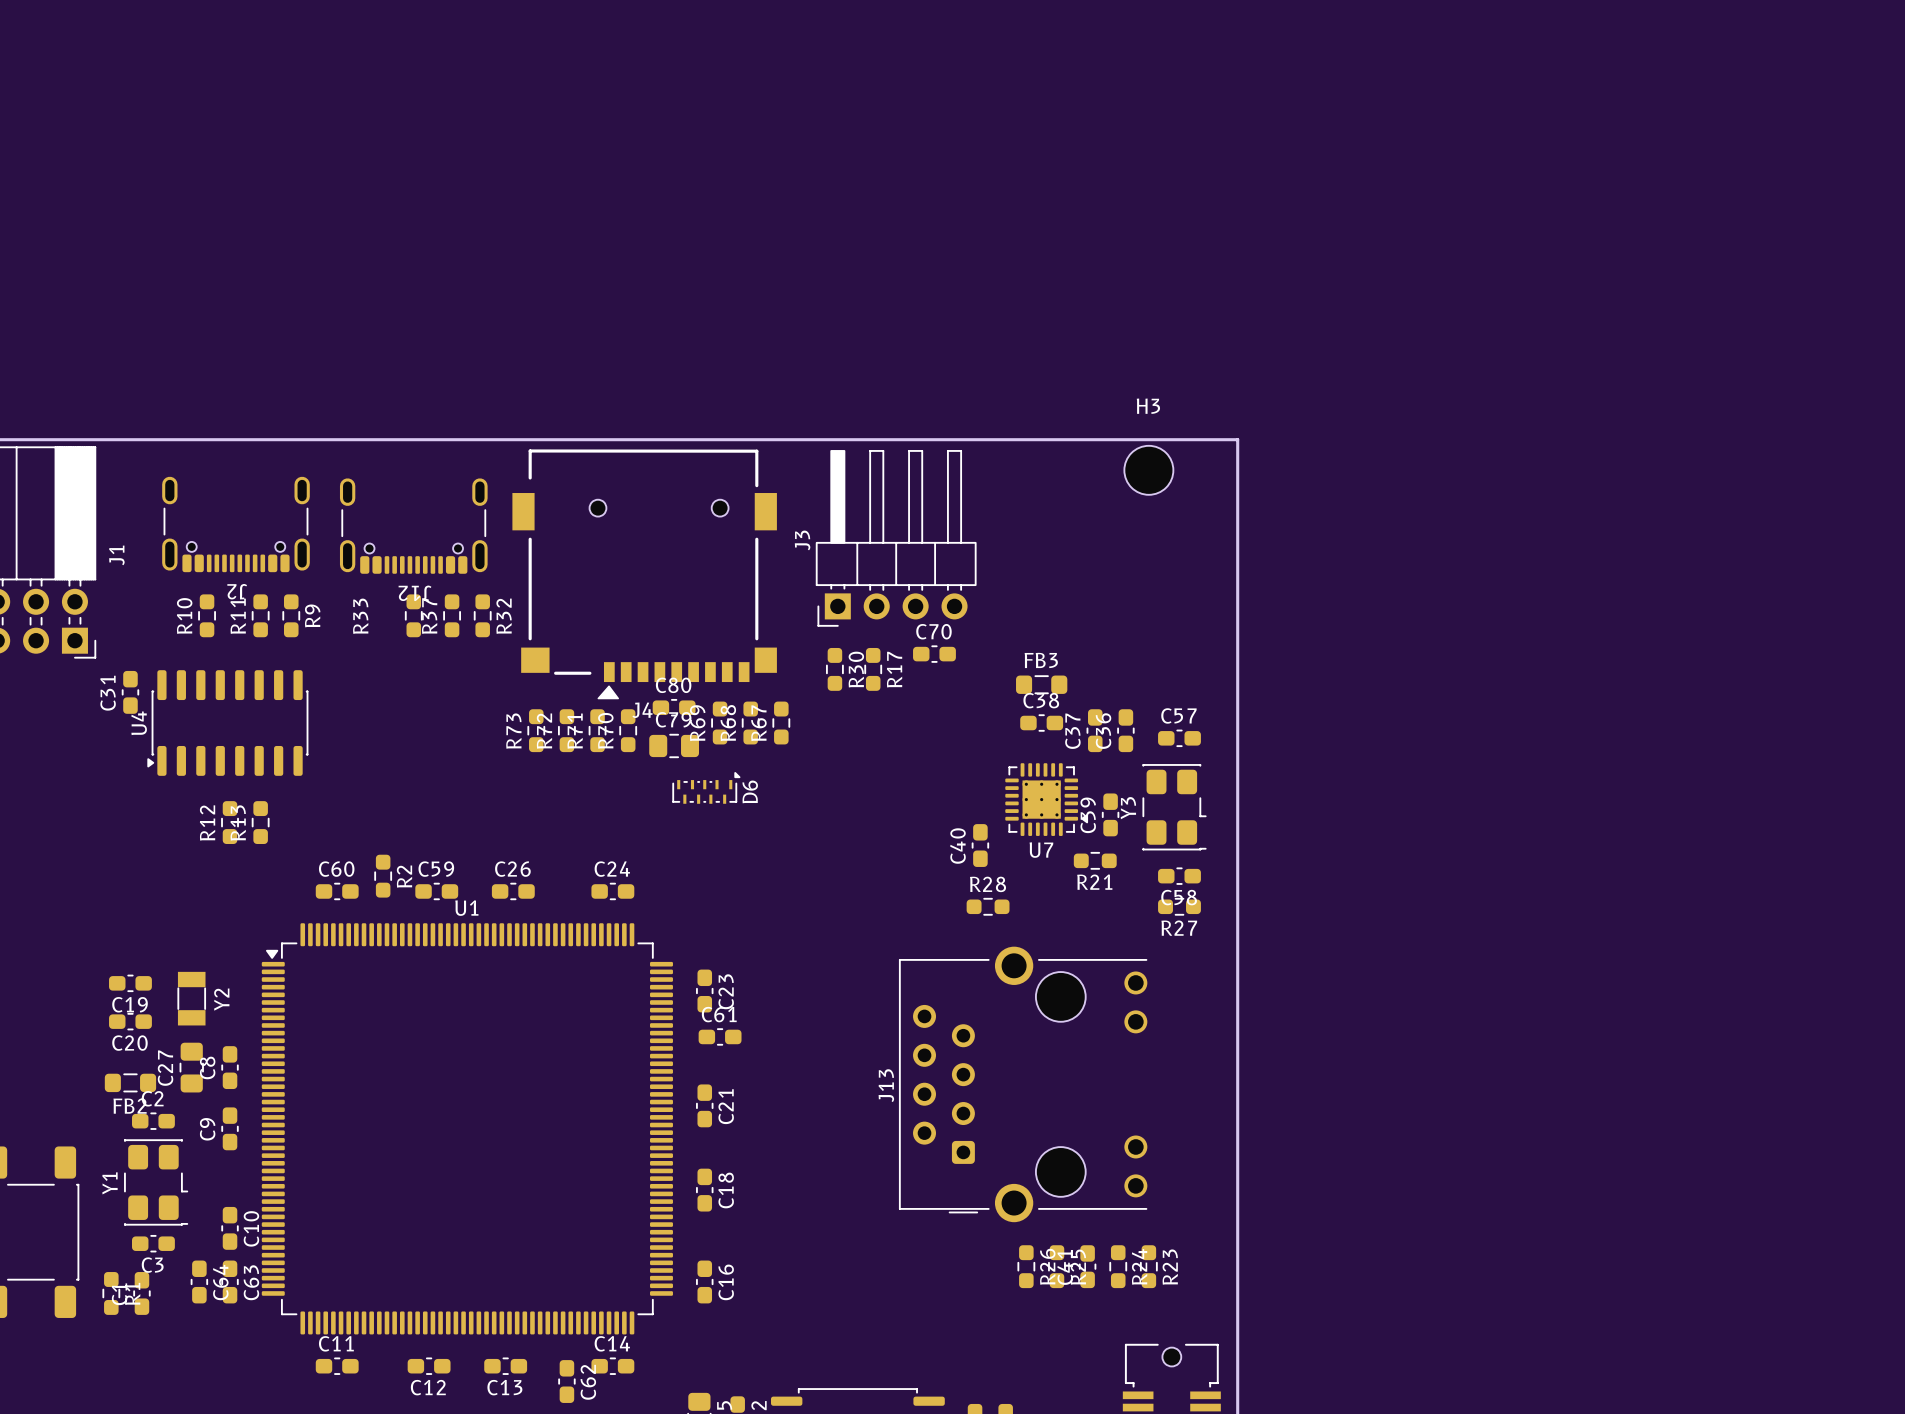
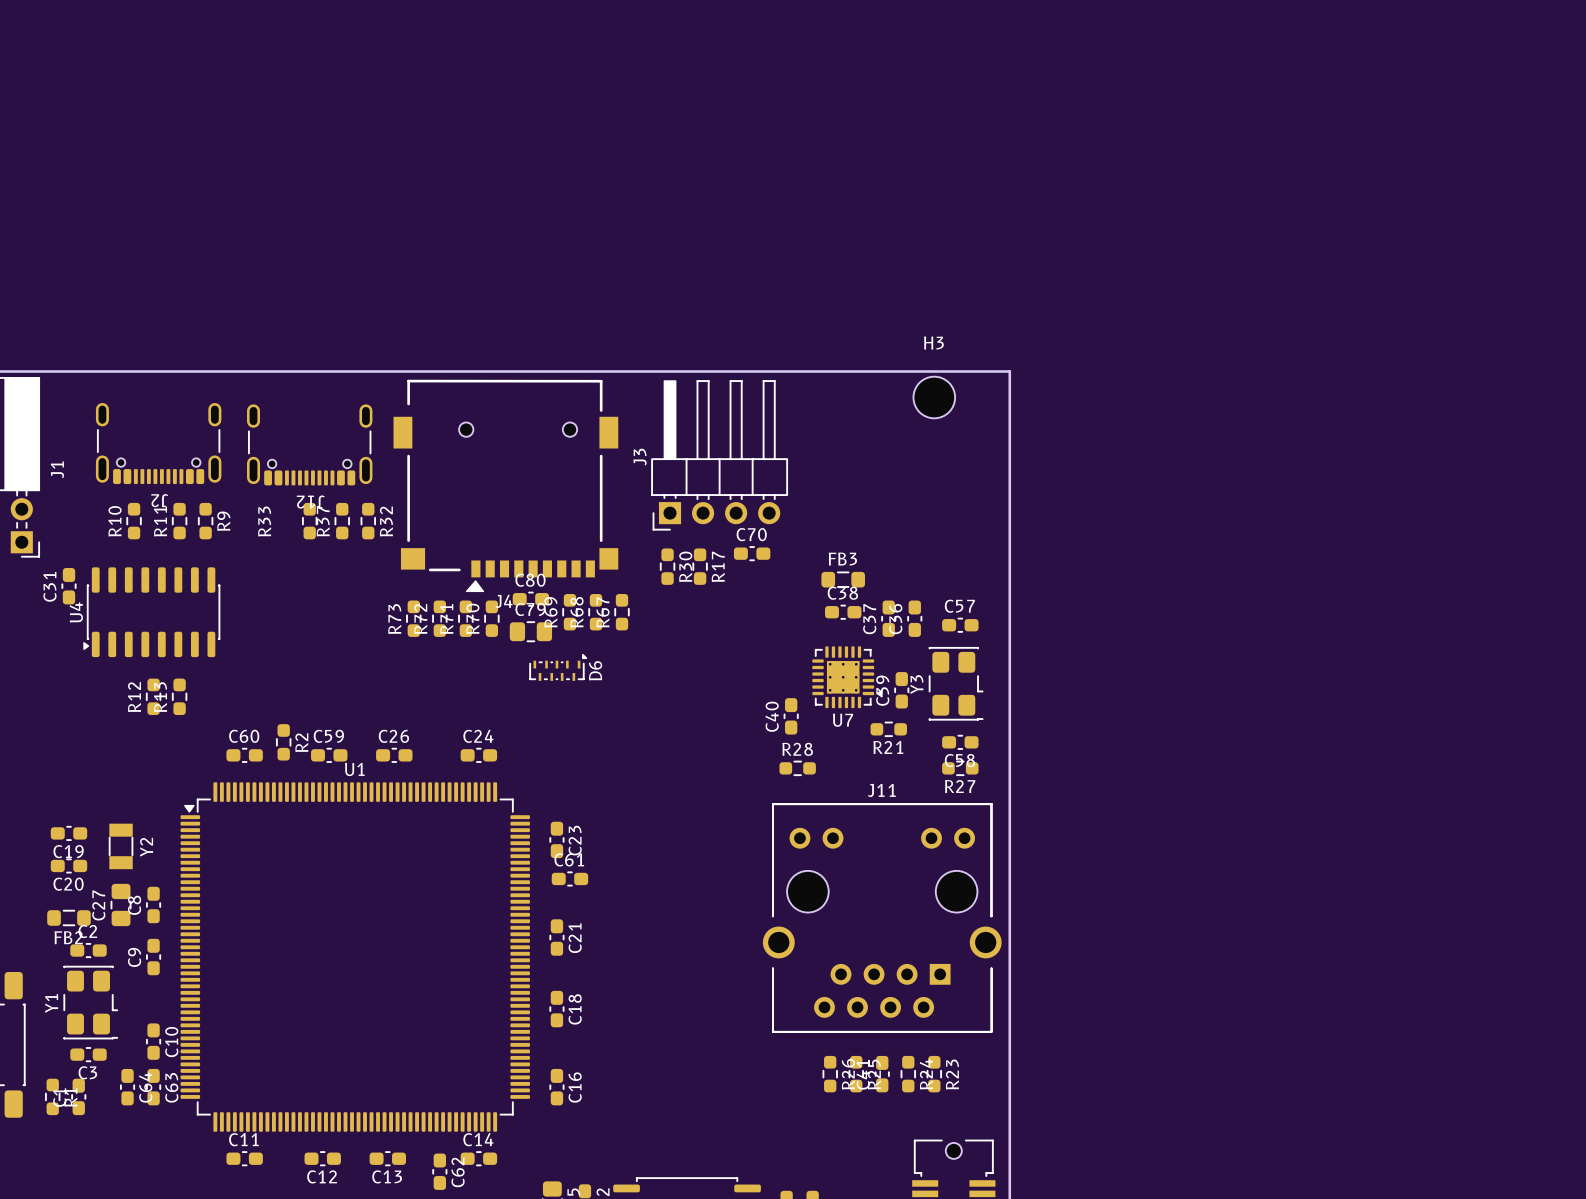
J11: none -> (882, 918)
J13: (1023, 1084) -> none

